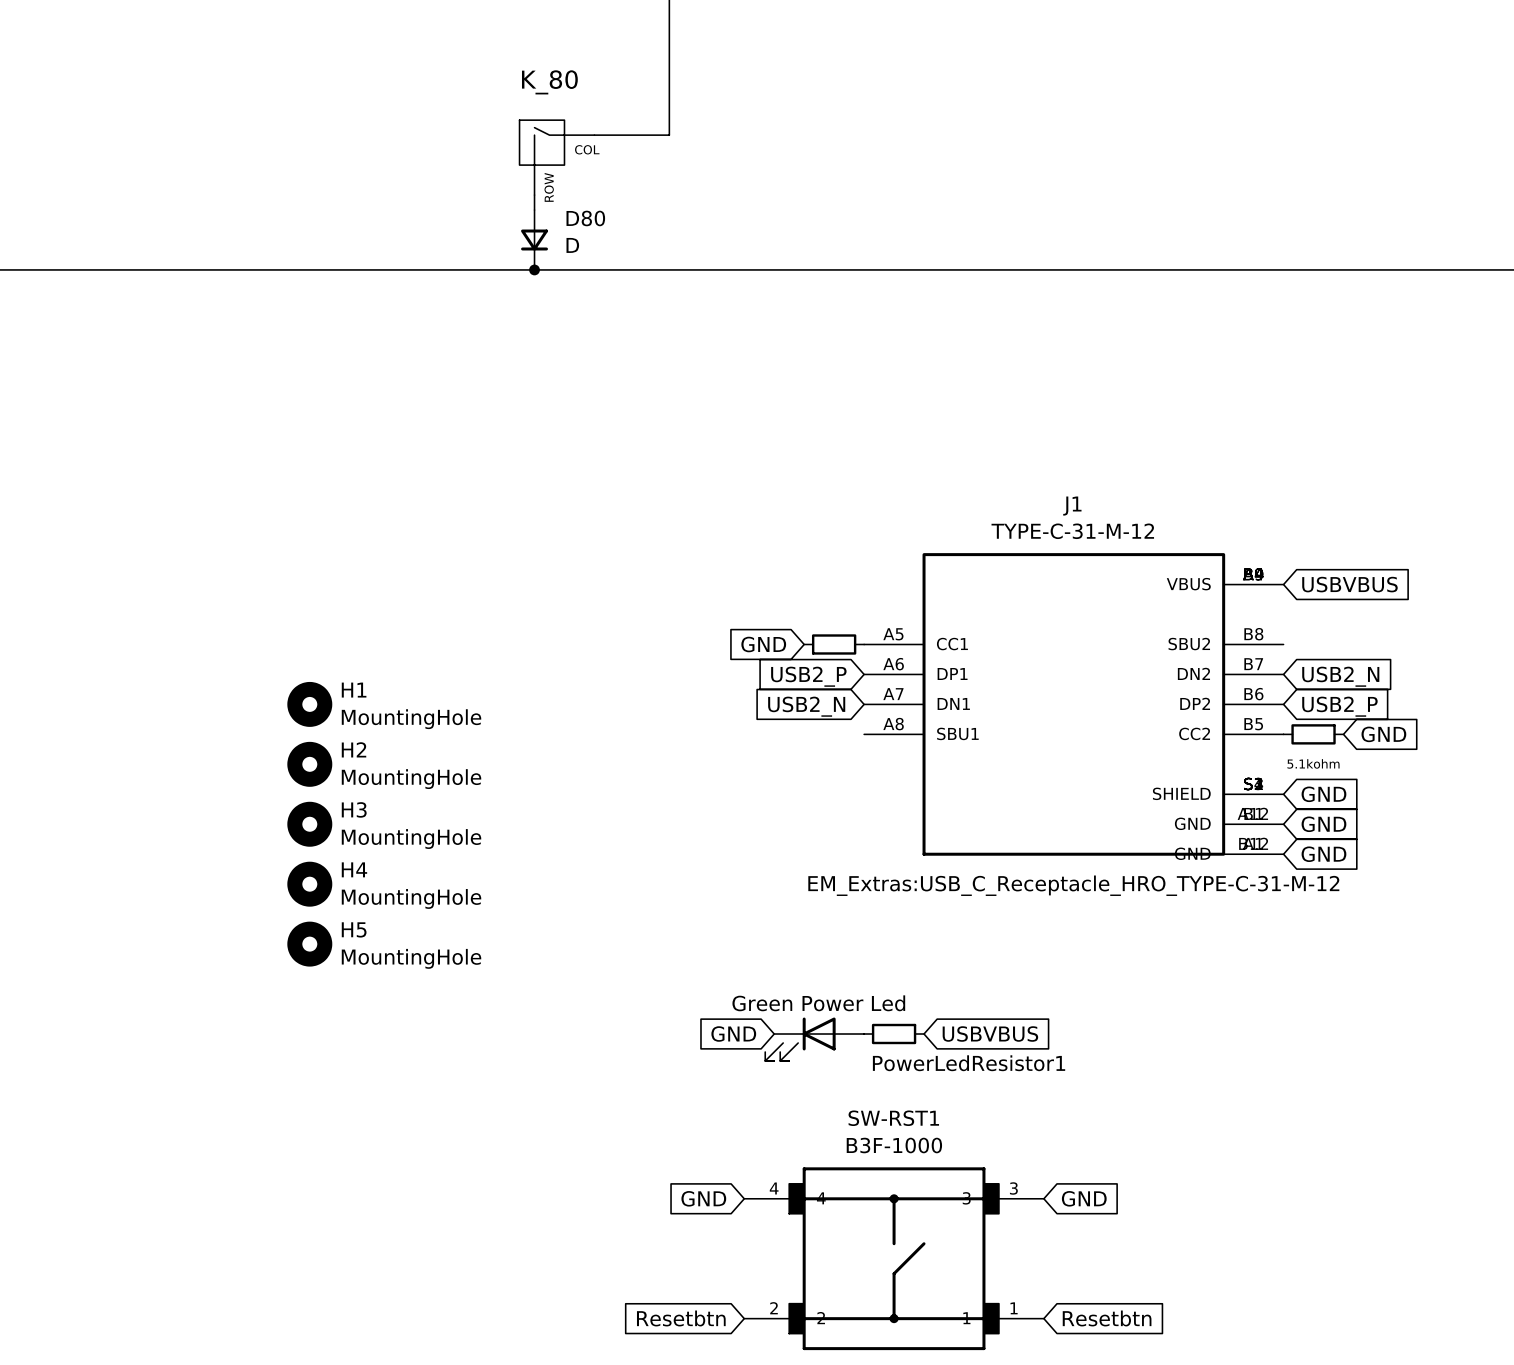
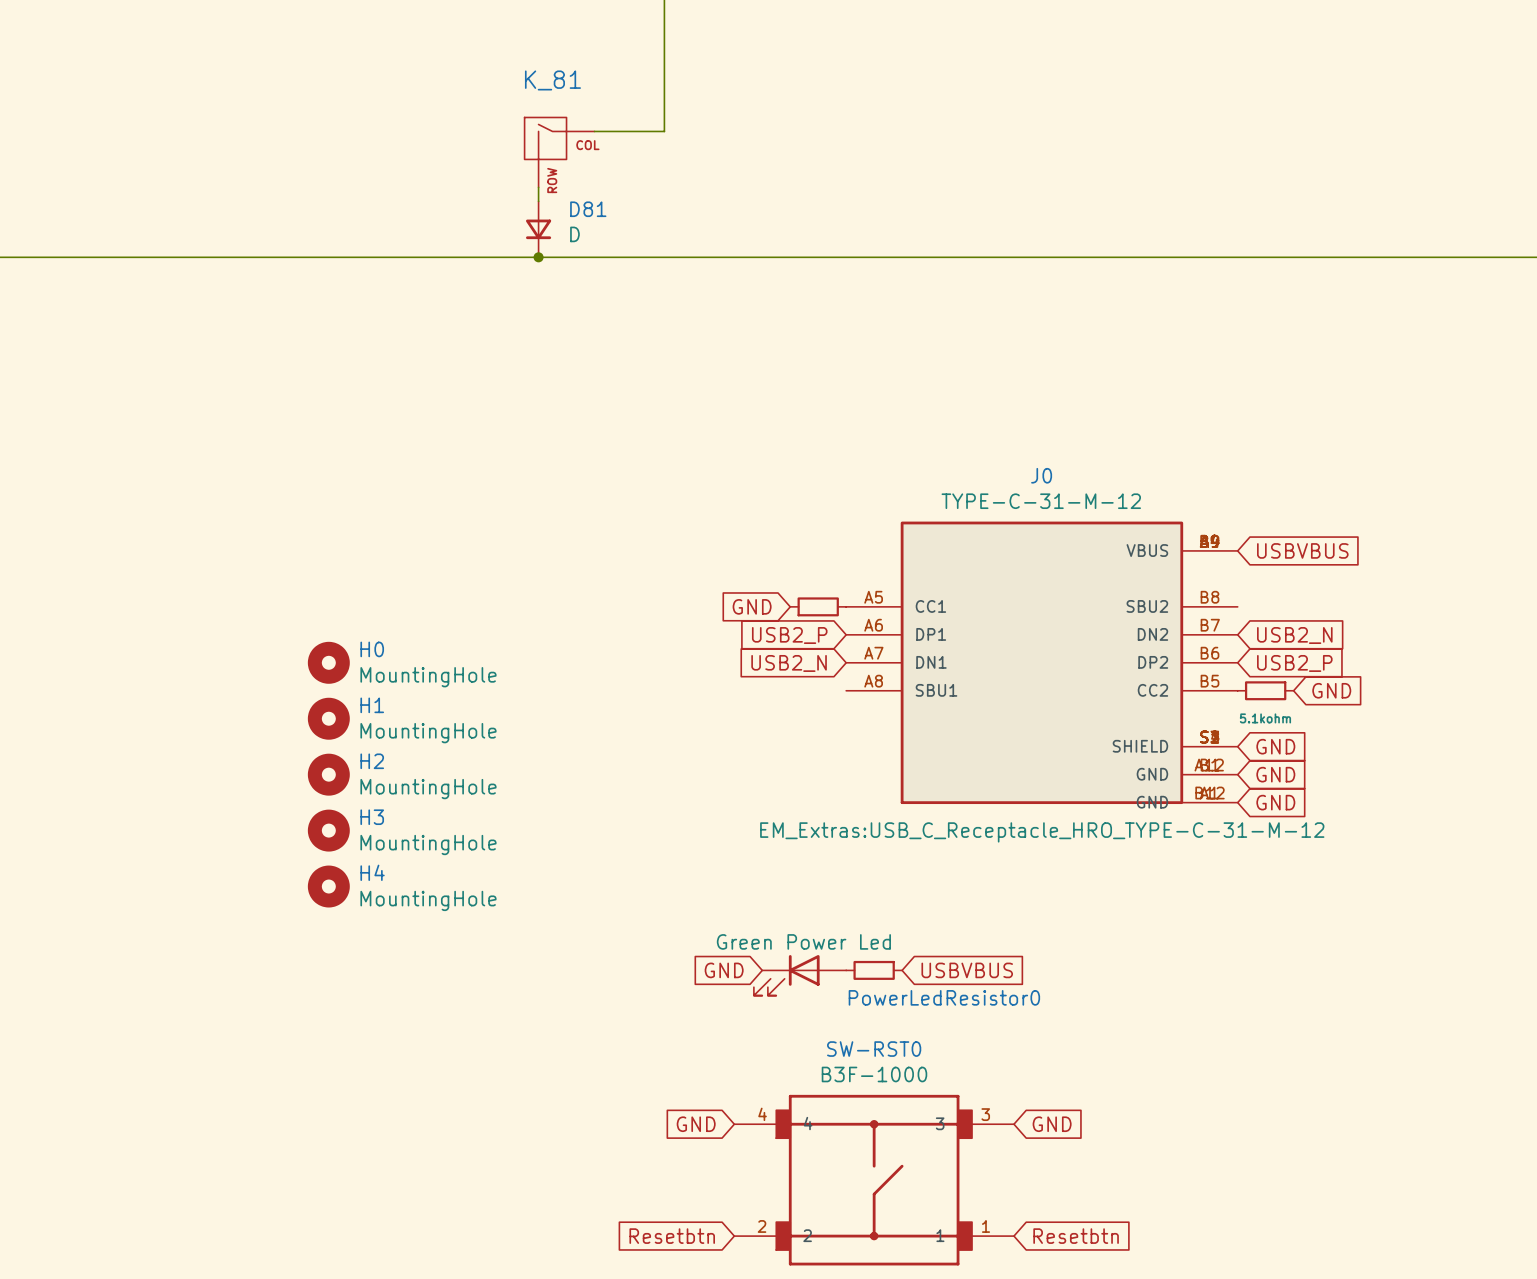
K_80 name: K_80 (549, 82) -> K_81 (552, 80)
D80 name: D80 (585, 218) -> D81 (588, 209)
J1 name: J1 (1072, 506) -> J0 (1041, 475)
H1 name: H1 (354, 690) -> H0 (372, 649)
H2 name: H2 (354, 749) -> H1 (372, 705)
H3 name: H3 (354, 809) -> H2 (372, 761)
H4 name: H4 (354, 869) -> H3 (372, 817)
H5 name: H5 (354, 929) -> H4 (372, 872)
PowerLedResistor1 name: PowerLedResistor1 (969, 1063) -> PowerLedResistor0 (944, 997)
SW-RST1 name: SW-RST1 (893, 1118) -> SW-RST0 (874, 1049)

